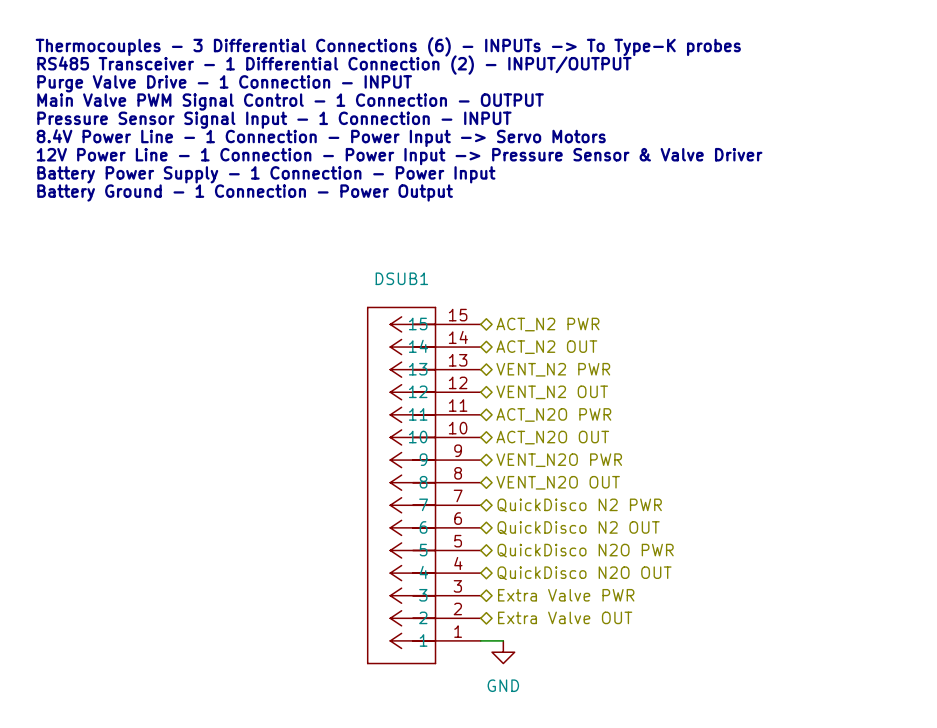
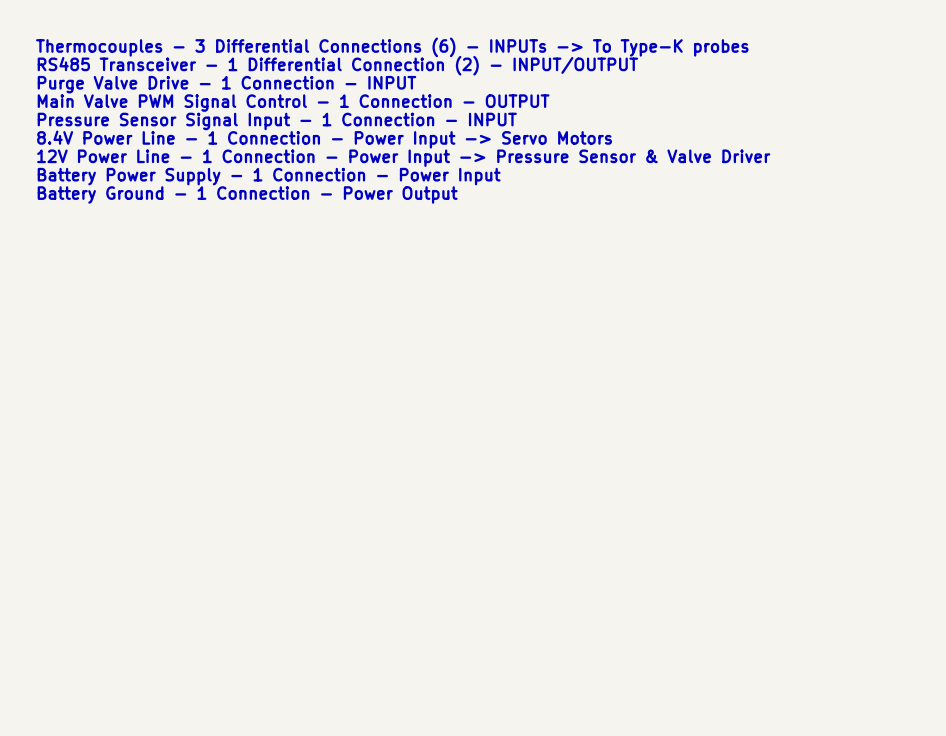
hierarchical label: ACT_N2 PWR (547, 324) -> none
hierarchical label: ACT_N2 OUT (546, 347) -> none
hierarchical label: VENT_N2 PWR (553, 369) -> none
hierarchical label: VENT_N2 OUT (552, 392) -> none
hierarchical label: ACT_N2O PWR (553, 414) -> none
hierarchical label: ACT_N2O OUT (552, 437) -> none
hierarchical label: VENT_N2O PWR (559, 460) -> none
hierarchical label: VENT_N2O OUT (558, 482) -> none
DSUB1: (423, 485) -> none
hierarchical label: QuickDisco N2 PWR (579, 505) -> none
hierarchical label: QuickDisco N2 OUT (578, 528) -> none
hierarchical label: QuickDisco N2O PWR (585, 550) -> none
hierarchical label: QuickDisco N2O OUT (584, 573) -> none
hierarchical label: Extra Valve PWR (566, 595) -> none
hierarchical label: Extra Valve OUT (565, 617) -> none
wire: (480, 640) (503, 640) -> none
power symbol: GND (503, 652) -> none

